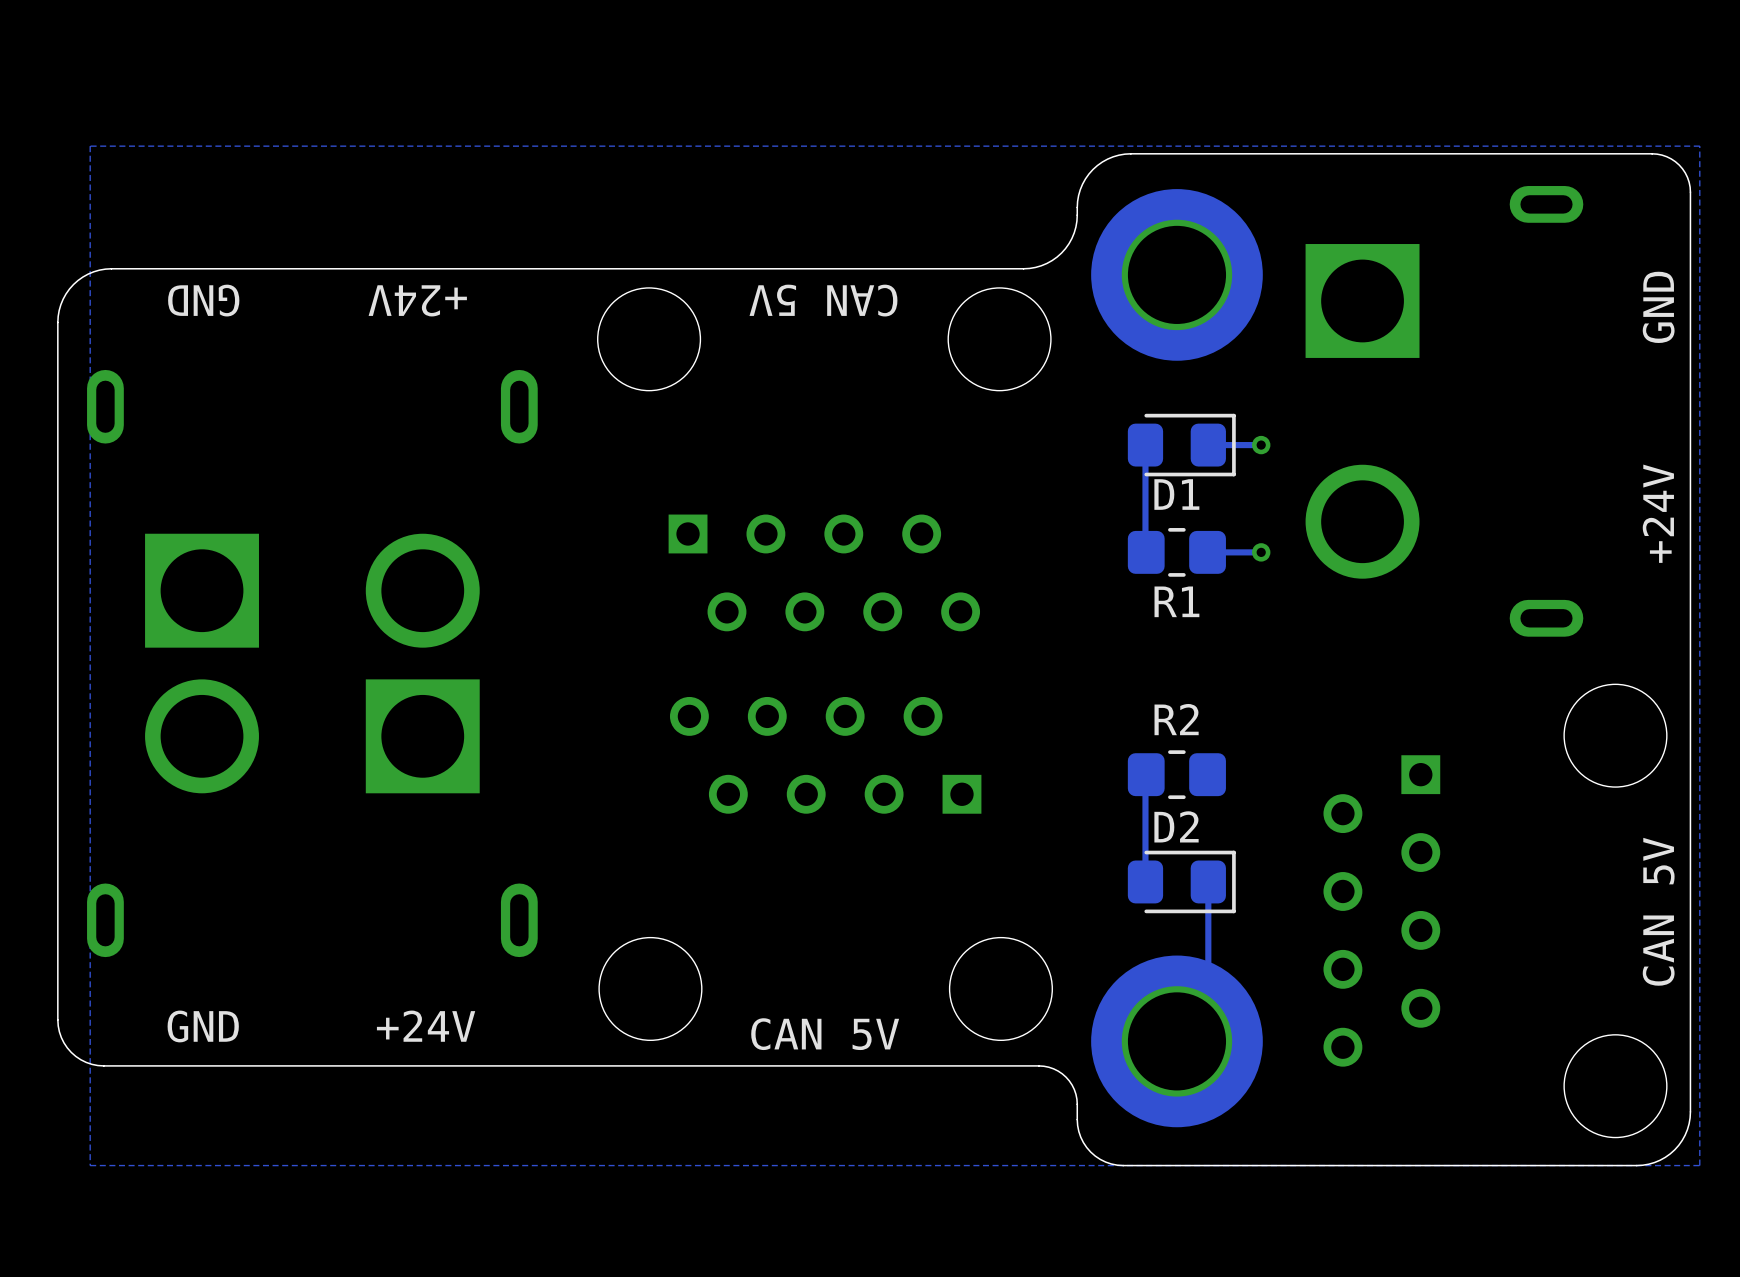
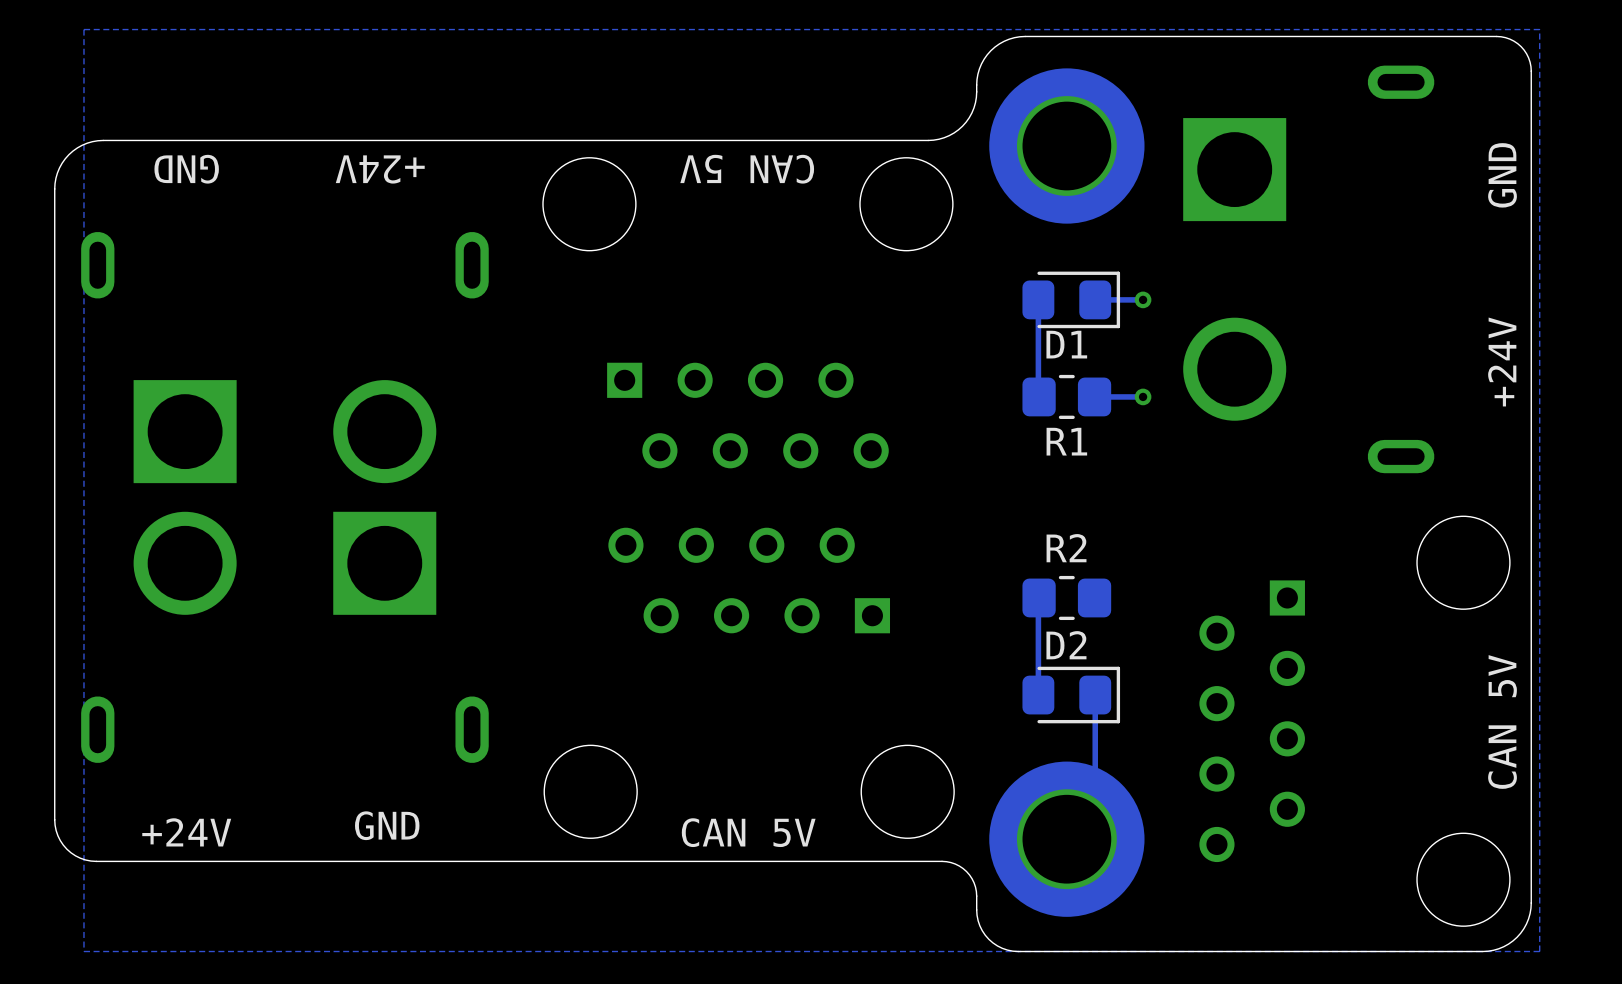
text: GND (203, 1026) -> +24V (186, 832)
text: +24V (426, 1026) -> GND (387, 825)

